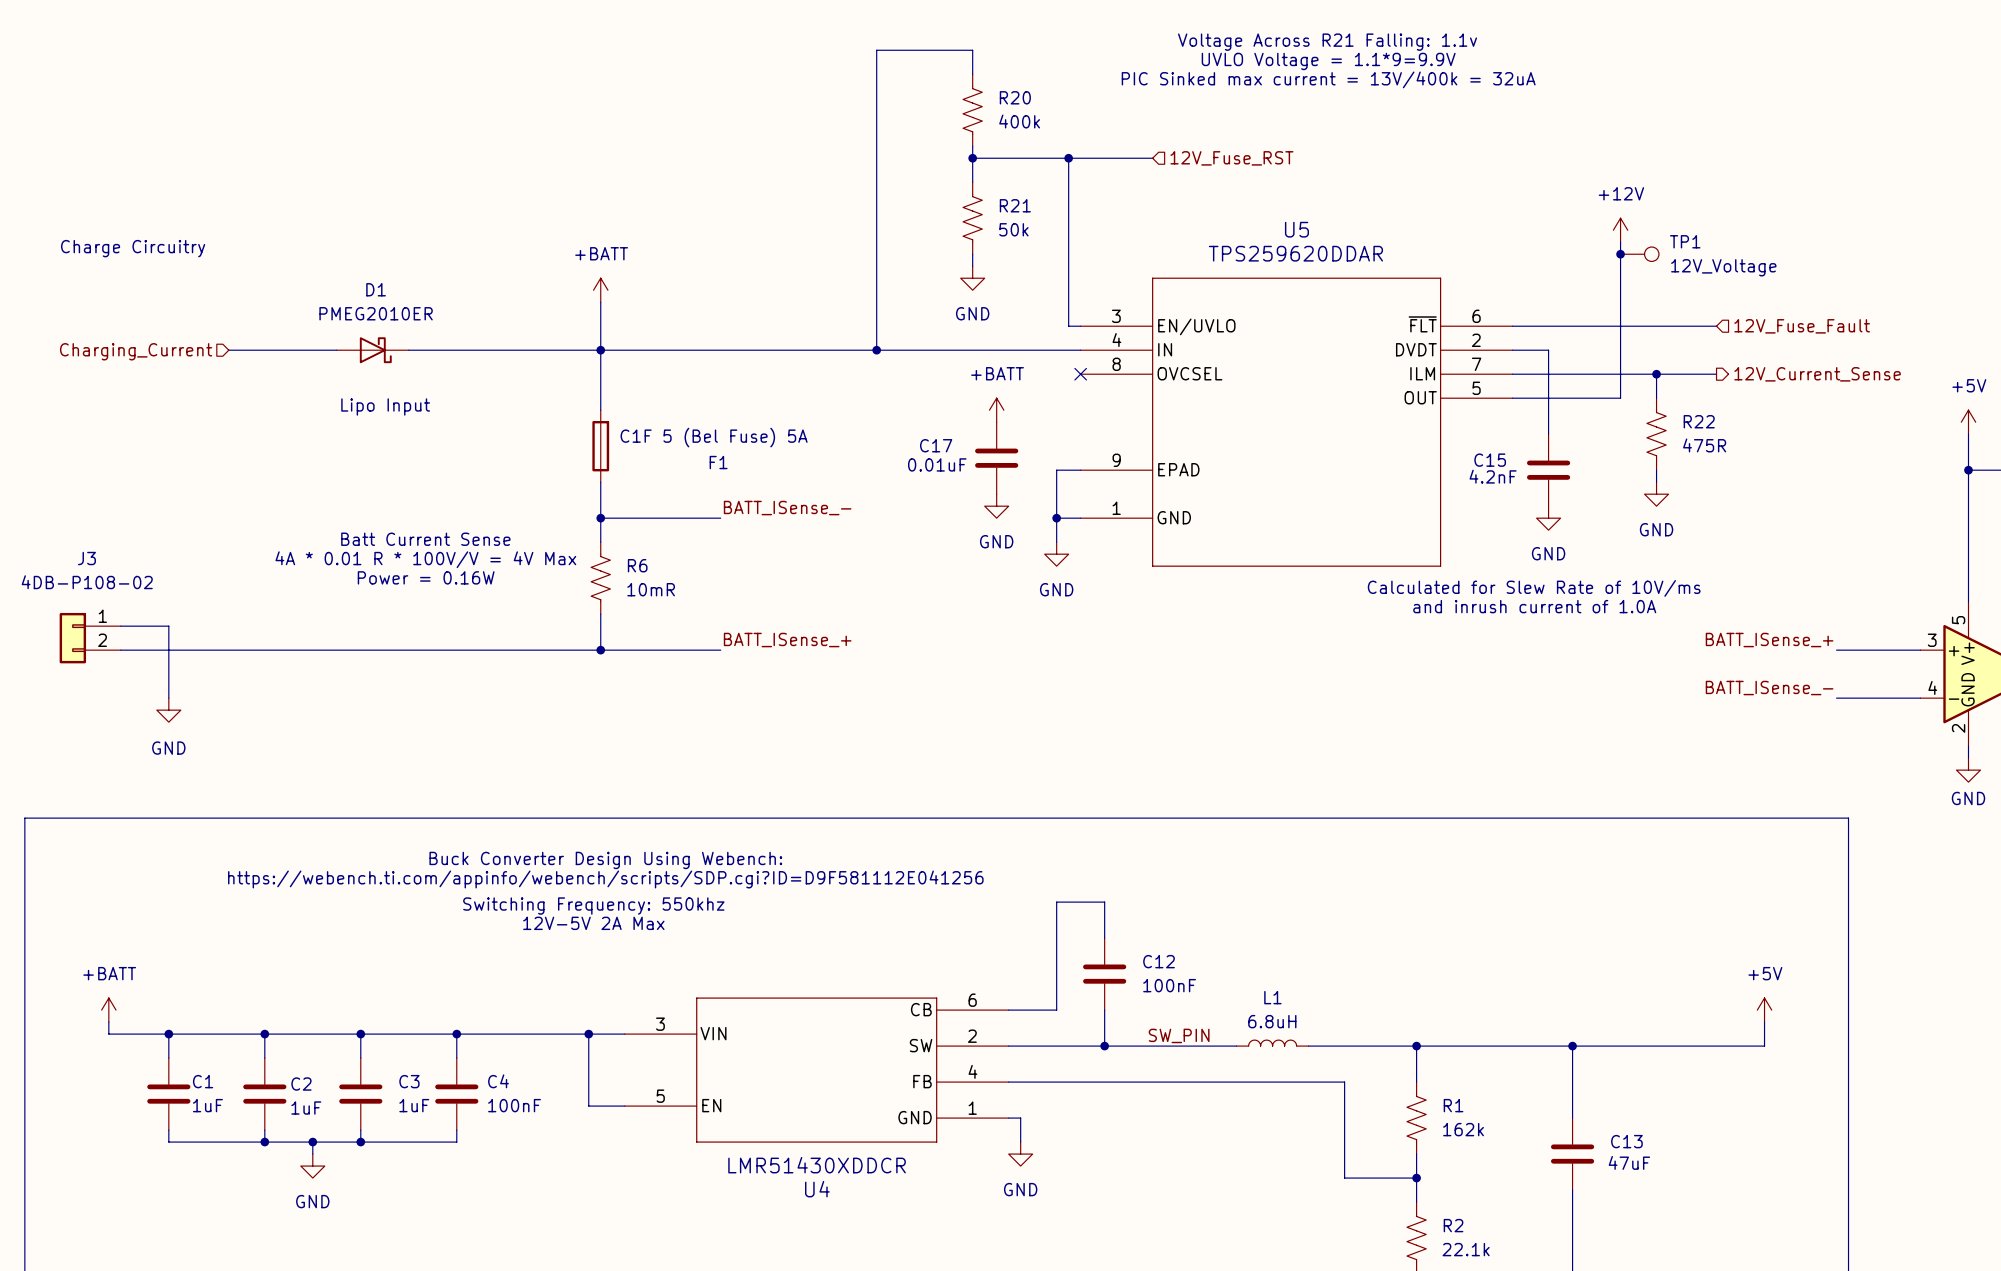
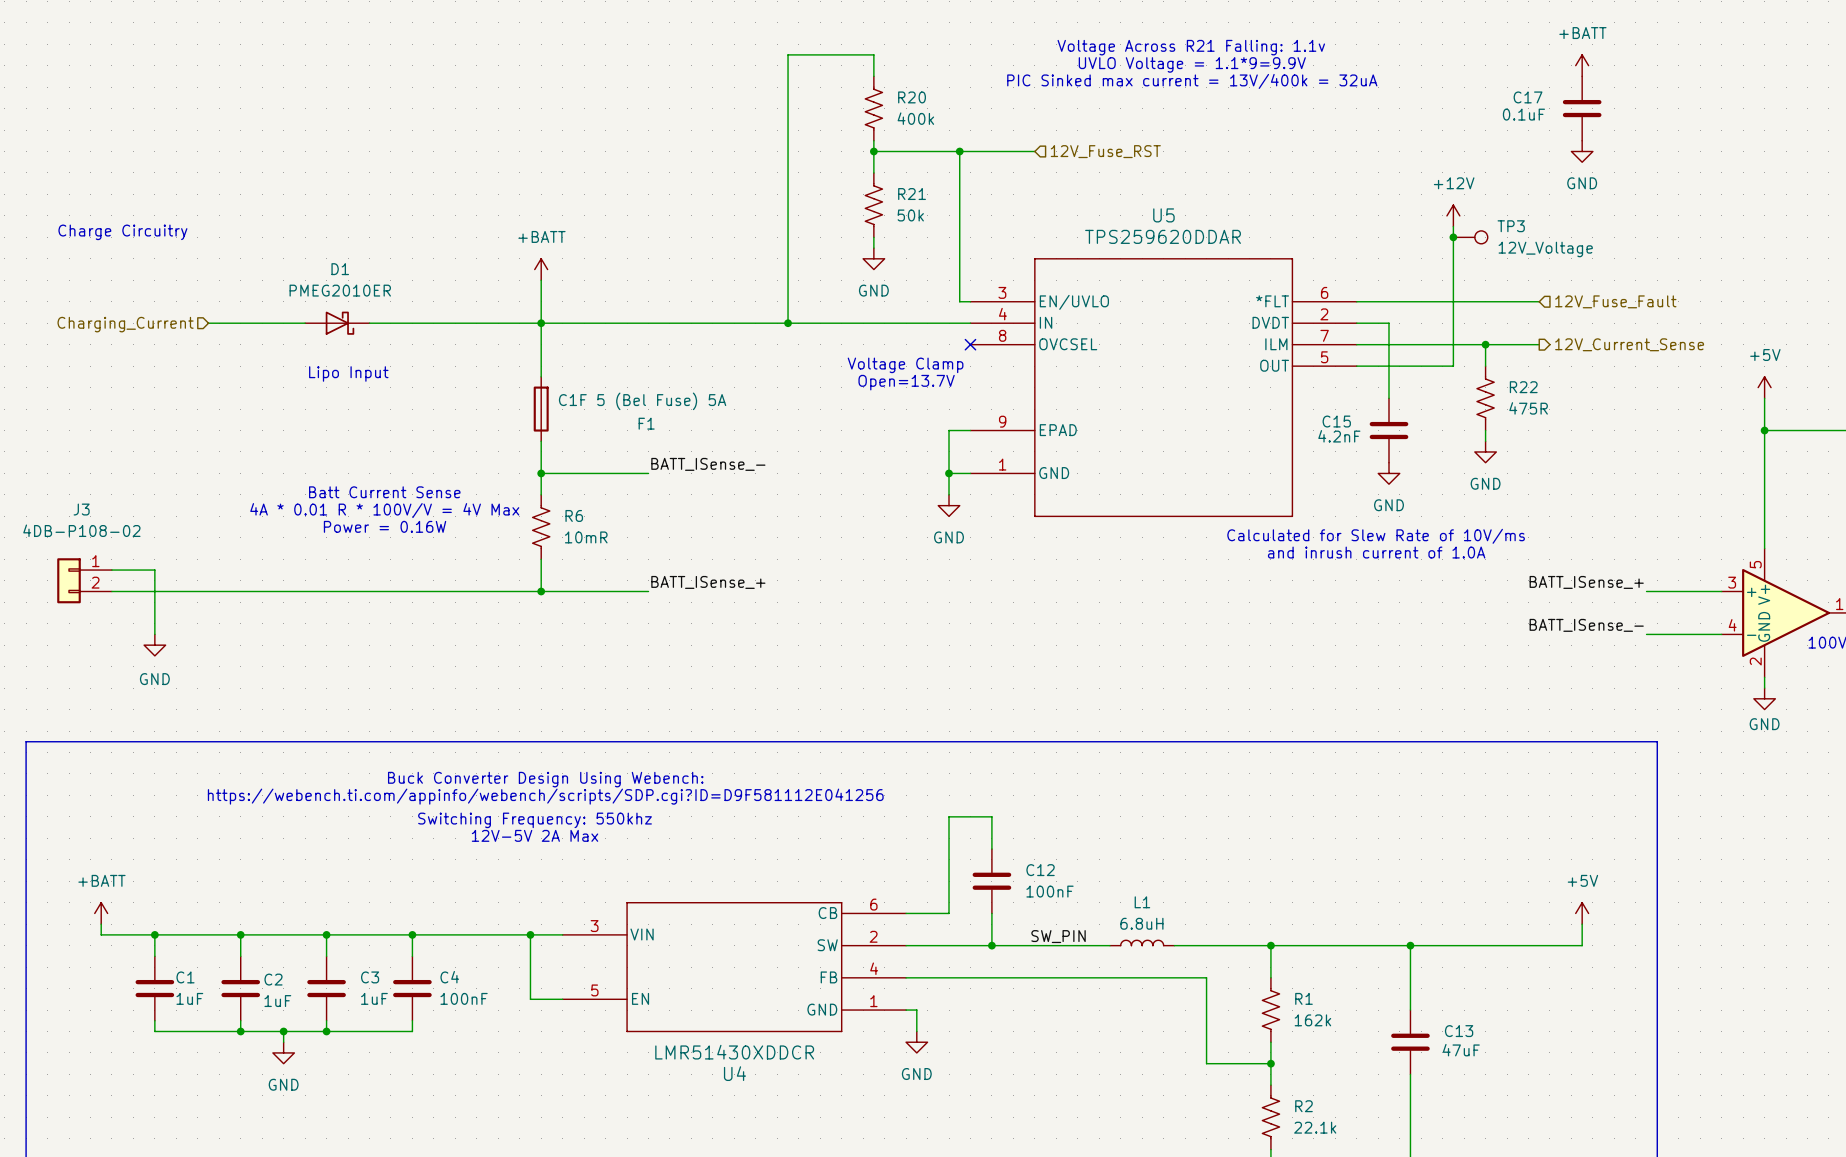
power symbol: none -> +BATT (1582, 65)
power symbol: none -> GND (1582, 151)
TP1 name: TP1 (1685, 241) -> TP3 (1511, 226)
U5 pin name: ~{FLT} (1422, 324) -> *FLT (1272, 301)
text: none -> Voltage Clamp (905, 365)
power symbol: +BATT (996, 410) -> none
text: none -> Open=13.7V (906, 382)
C17 position: (996, 458) -> (1582, 108)
C17 value: 0.01uF (937, 464) -> 0.1uF (1523, 114)
power symbol: GND (996, 506) -> none

